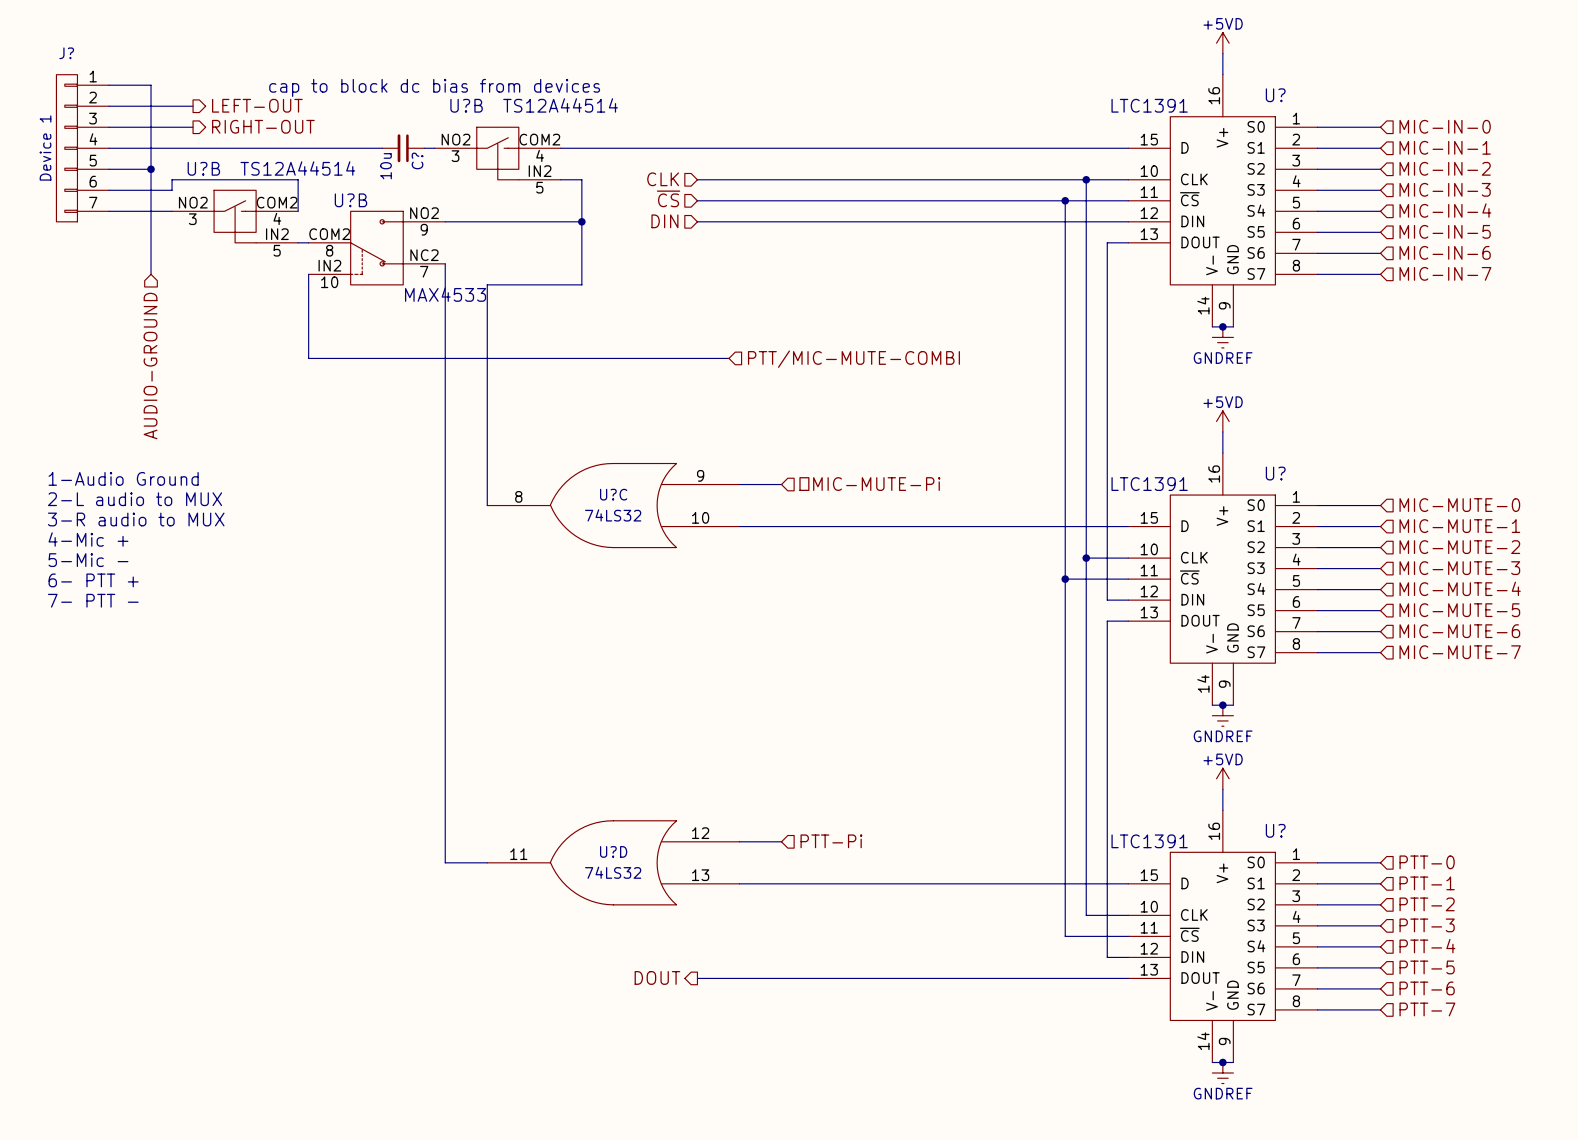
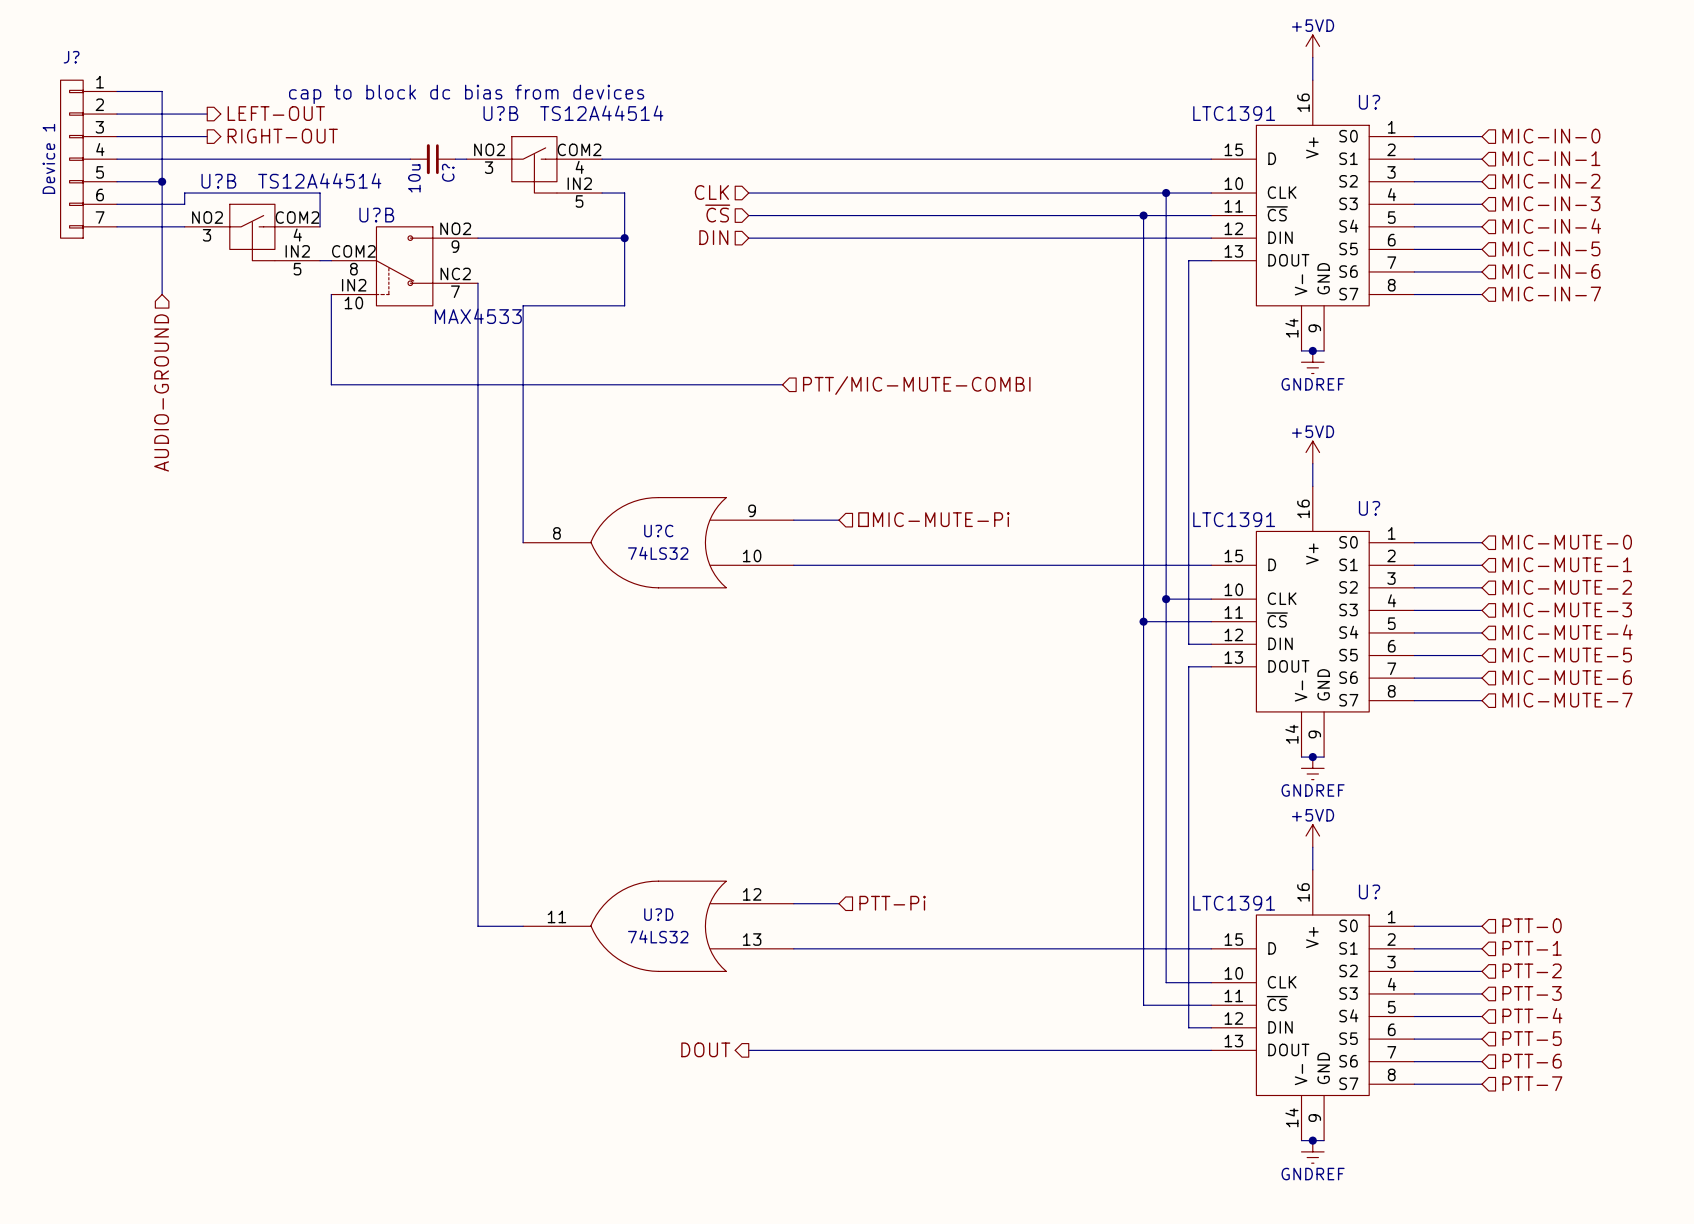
text: 1-Audio Ground (123, 478) -> none
text: 2-L audio to MUX (135, 499) -> none
text: 3-R audio to MUX (136, 519) -> none
text: 4-Mic + (88, 539) -> none
text: 5-Mic - (88, 560) -> none
text: 6- PTT + (93, 580) -> none
text: 7- PTT - (93, 600) -> none

